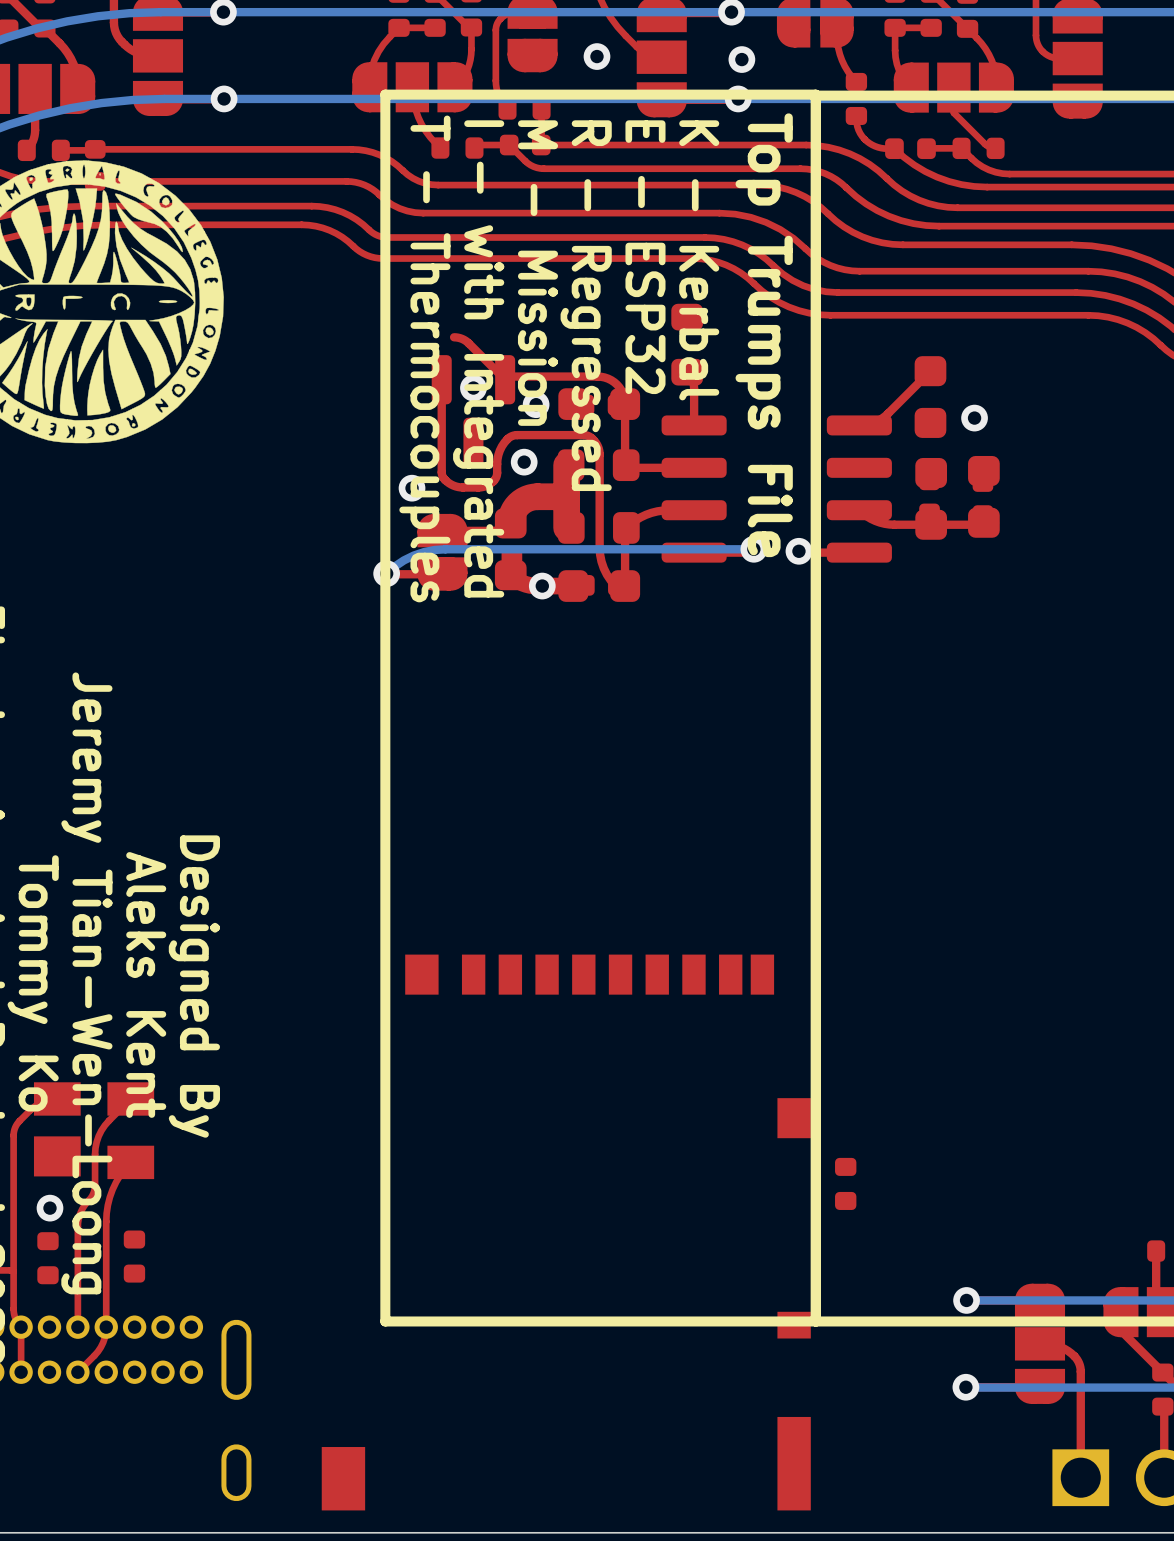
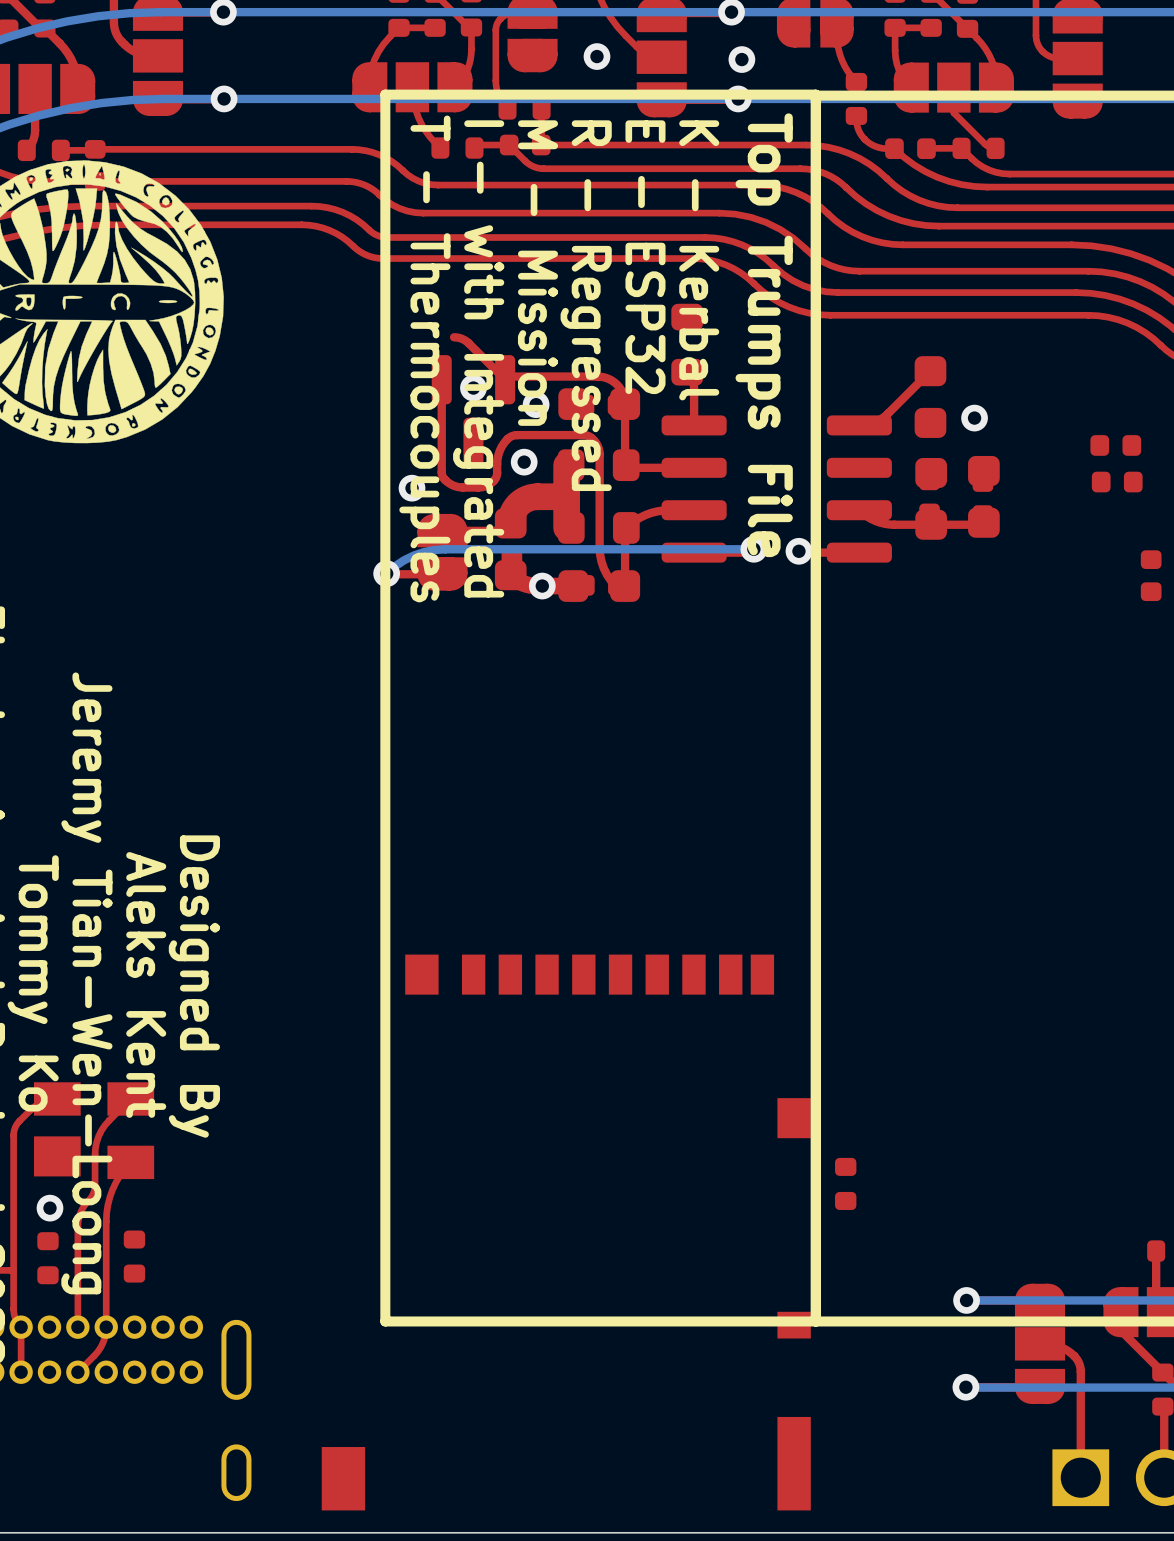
part: none -> (1115, 445)
part: none -> (1117, 482)
part: none -> (1151, 575)

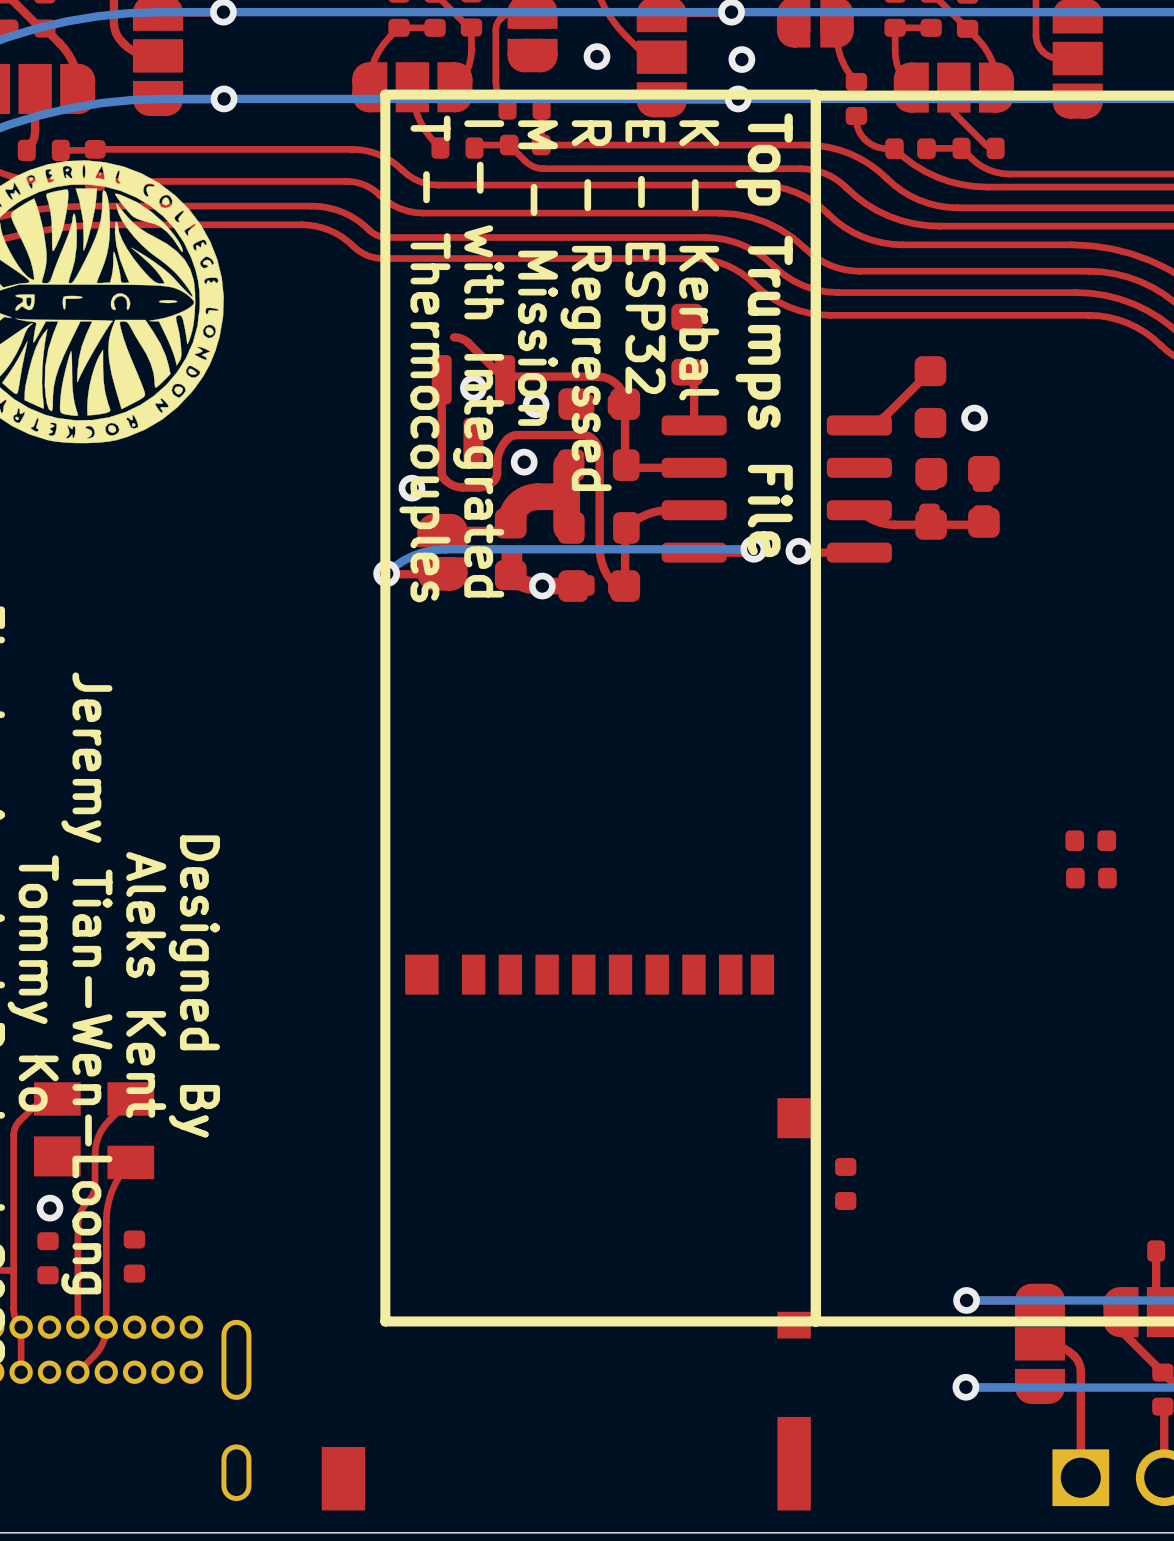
part: (1115, 445) -> none
part: (1117, 482) -> none
part: (1151, 575) -> none
part: none -> (1090, 840)
part: none -> (1091, 878)

